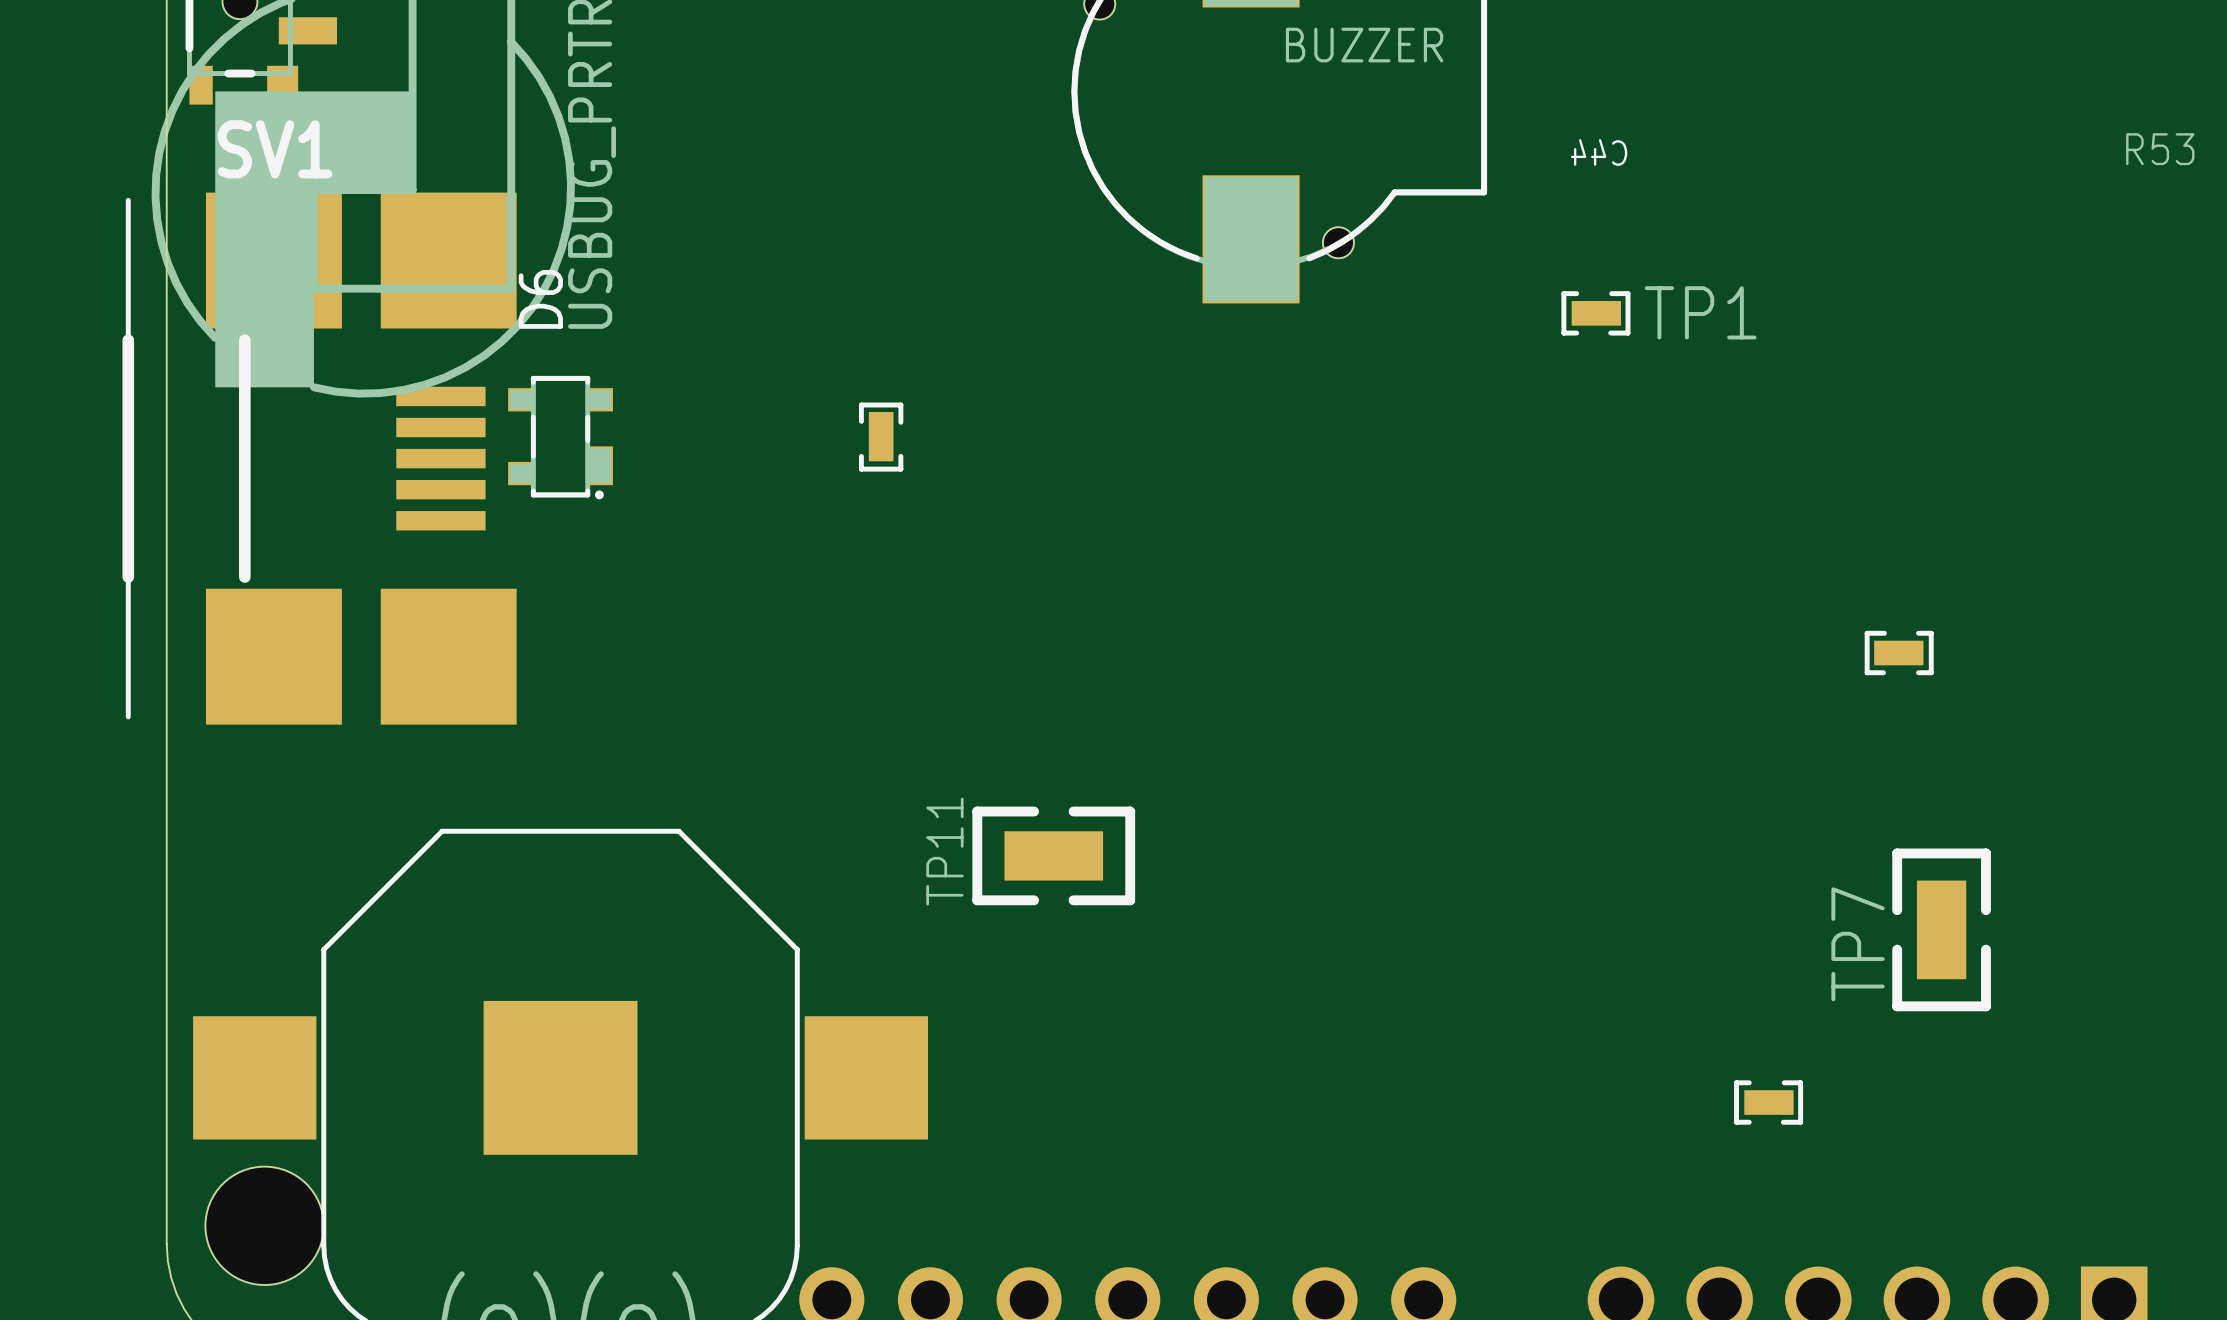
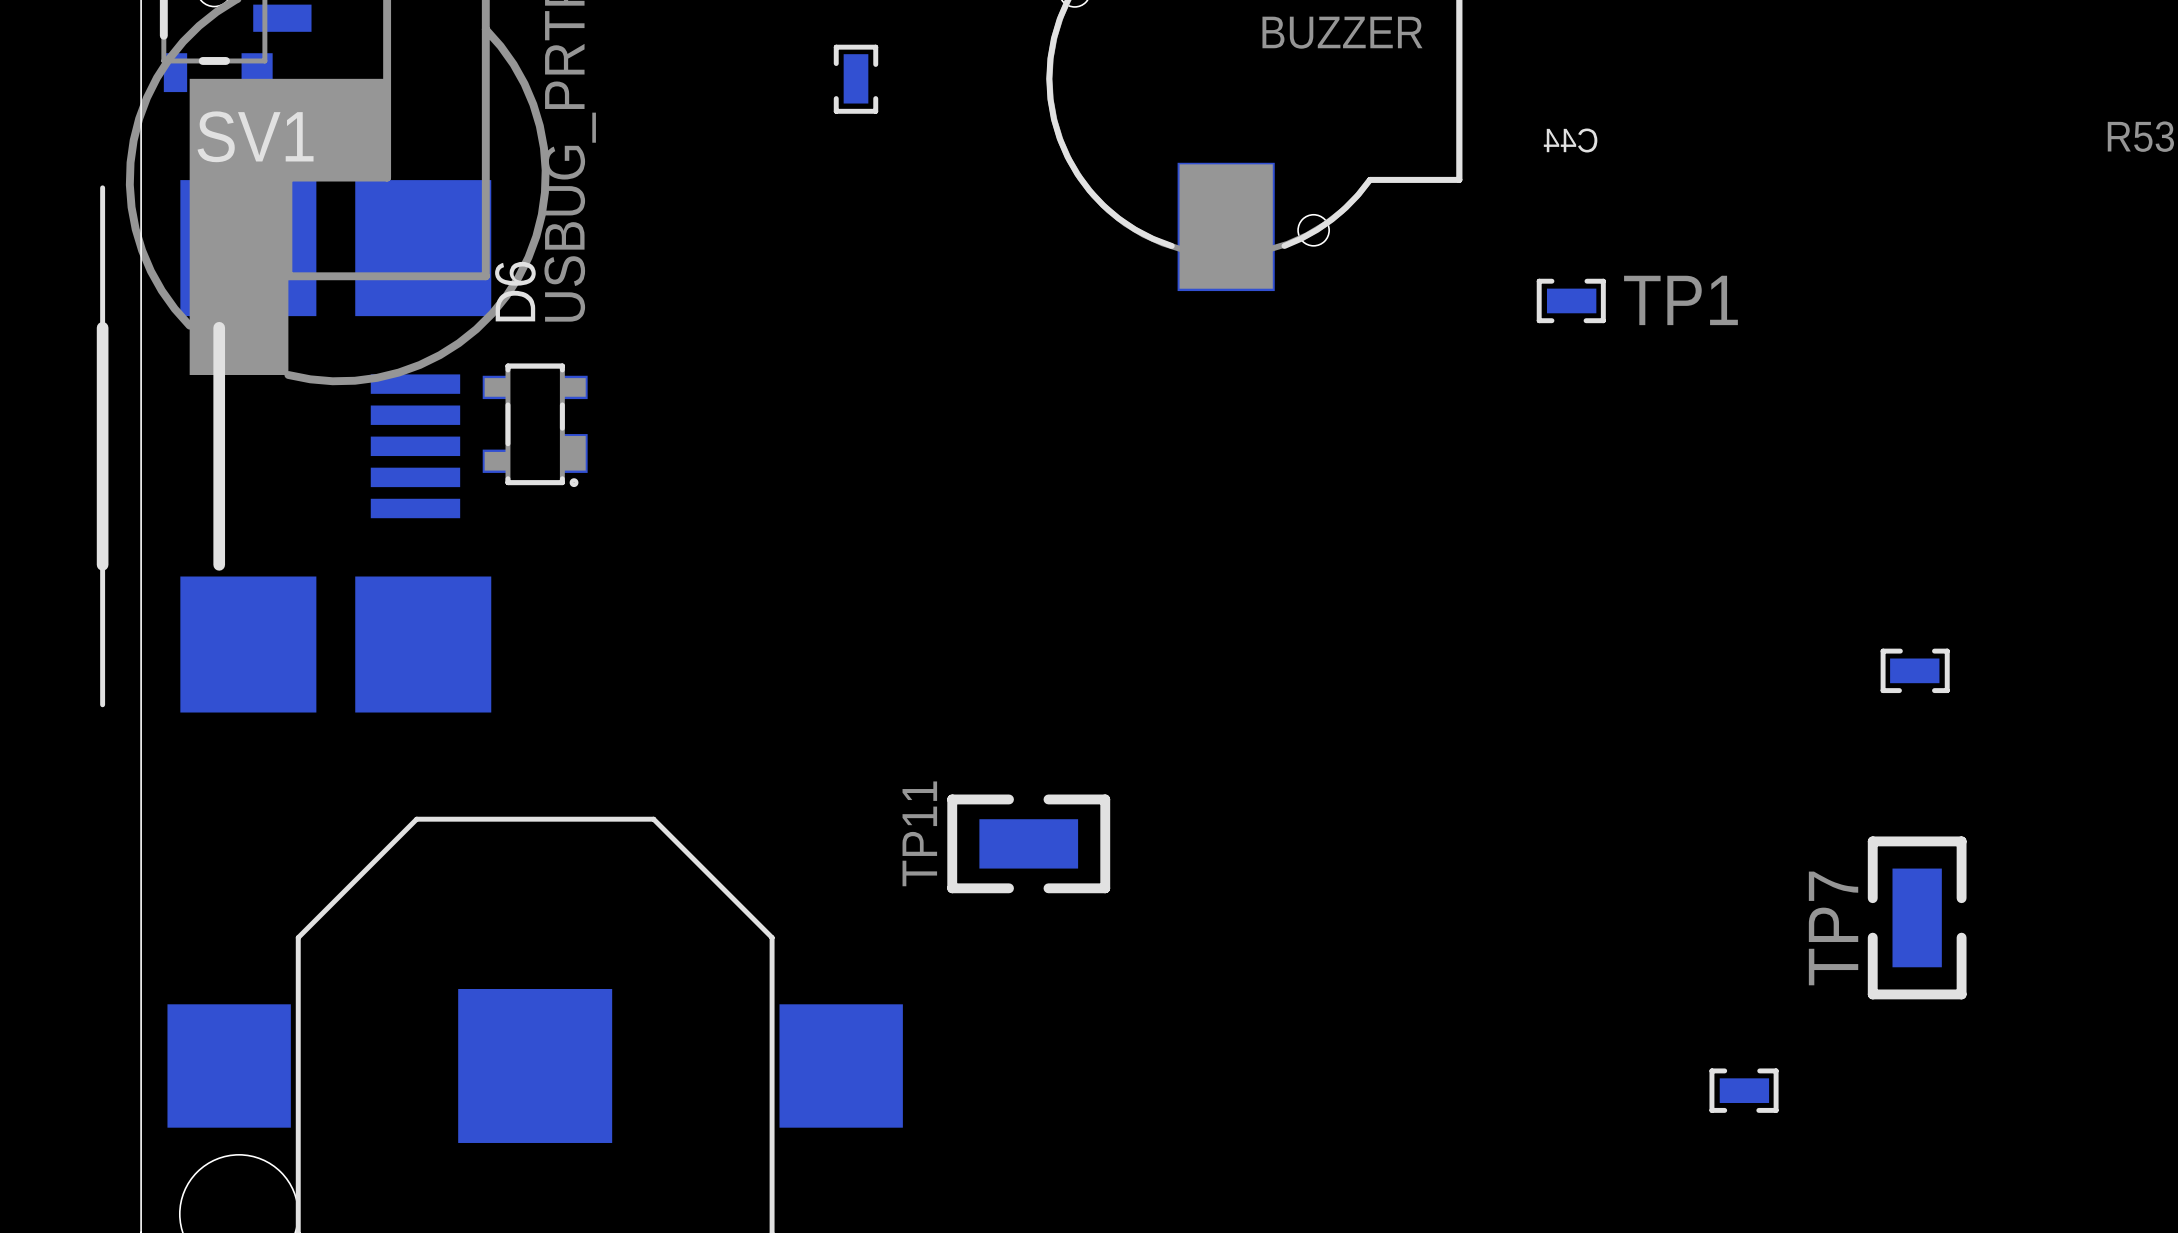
part position: (881, 437) -> (855, 79)
part position: (1899, 653) -> (1915, 670)

